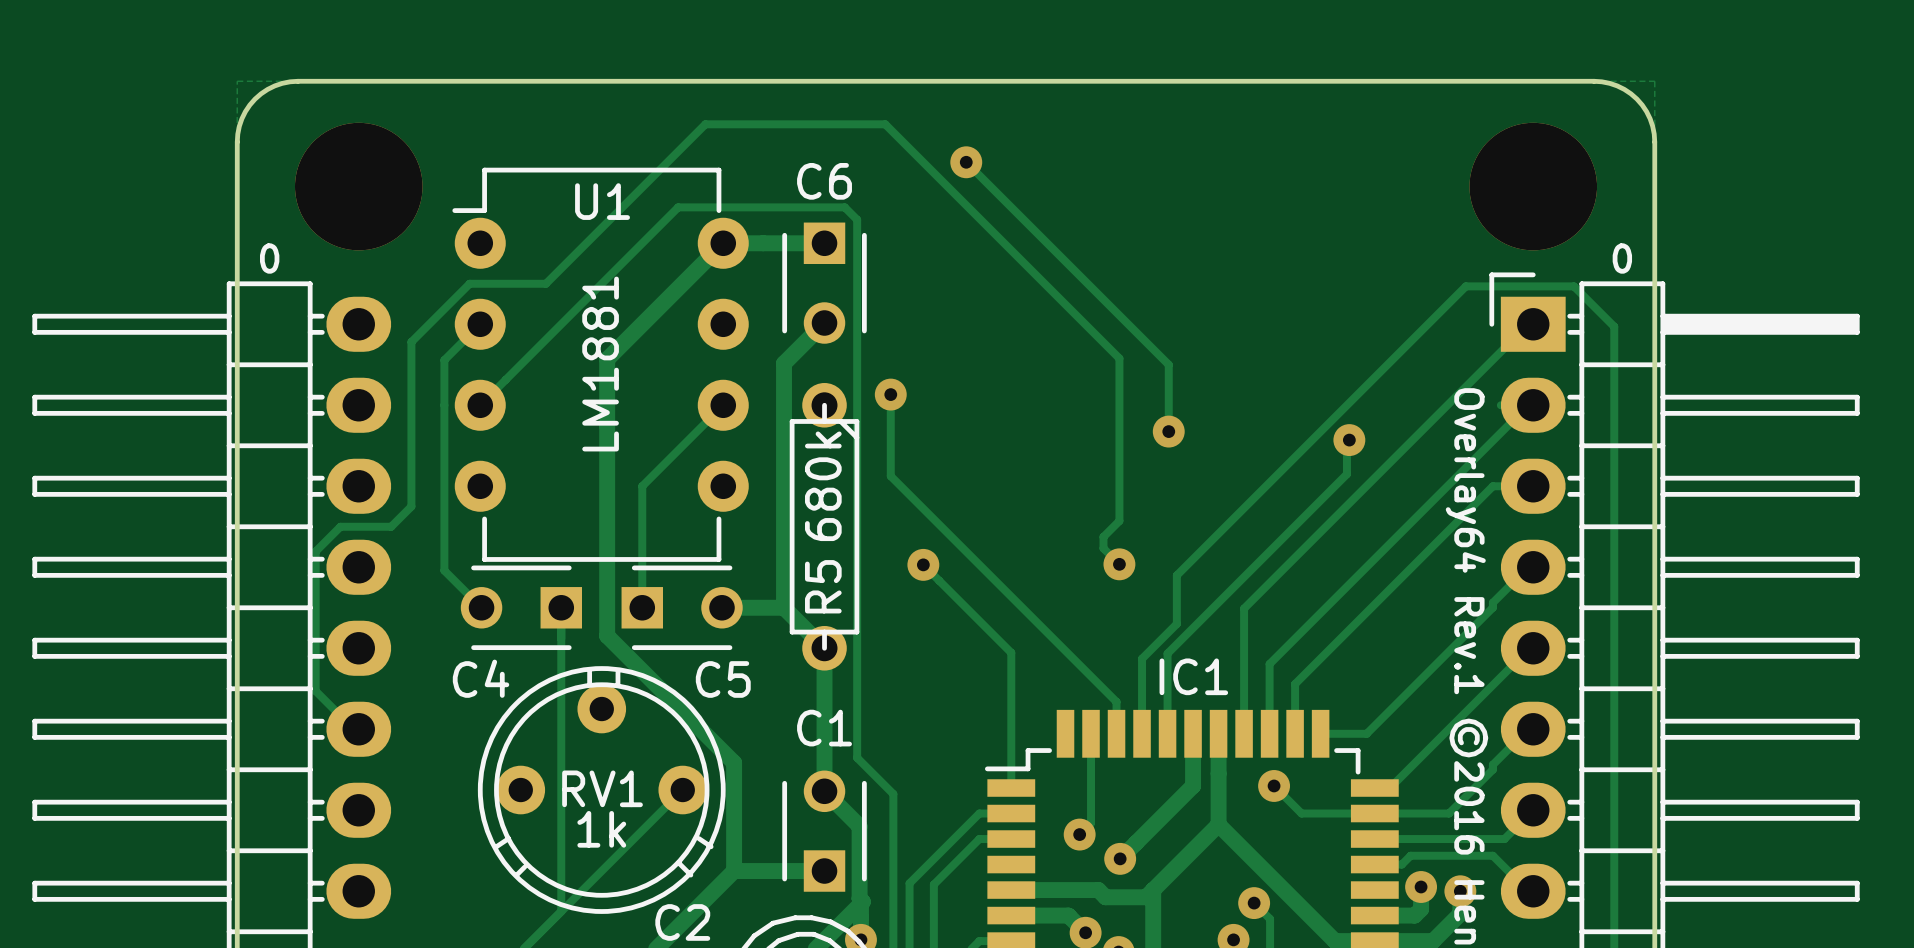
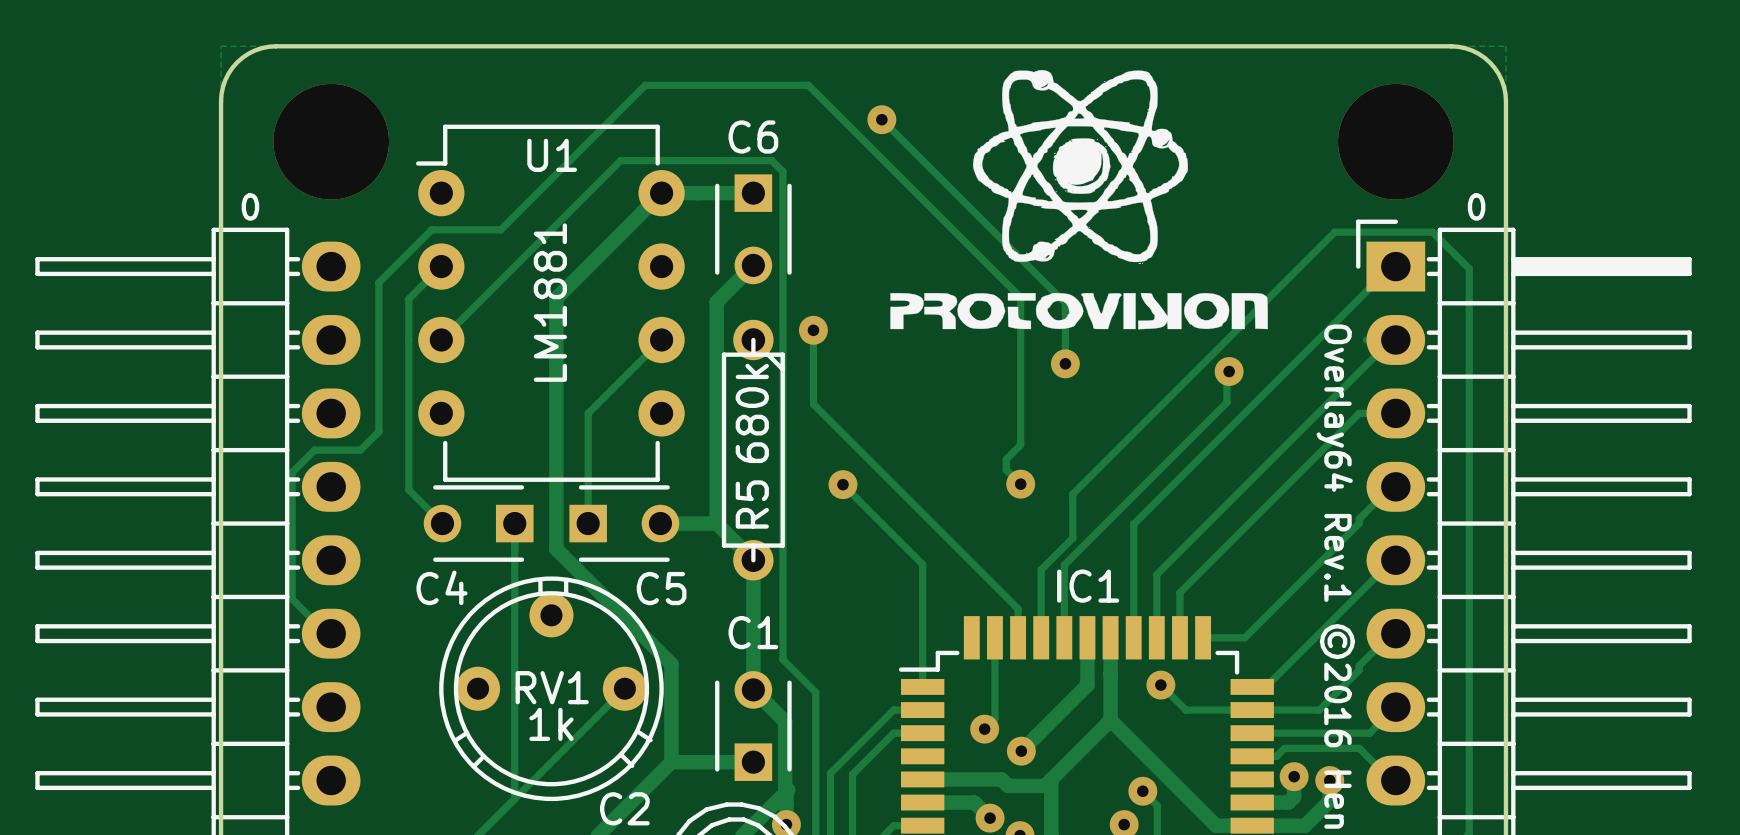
drawing: none -> [890, 70, 1268, 330]

